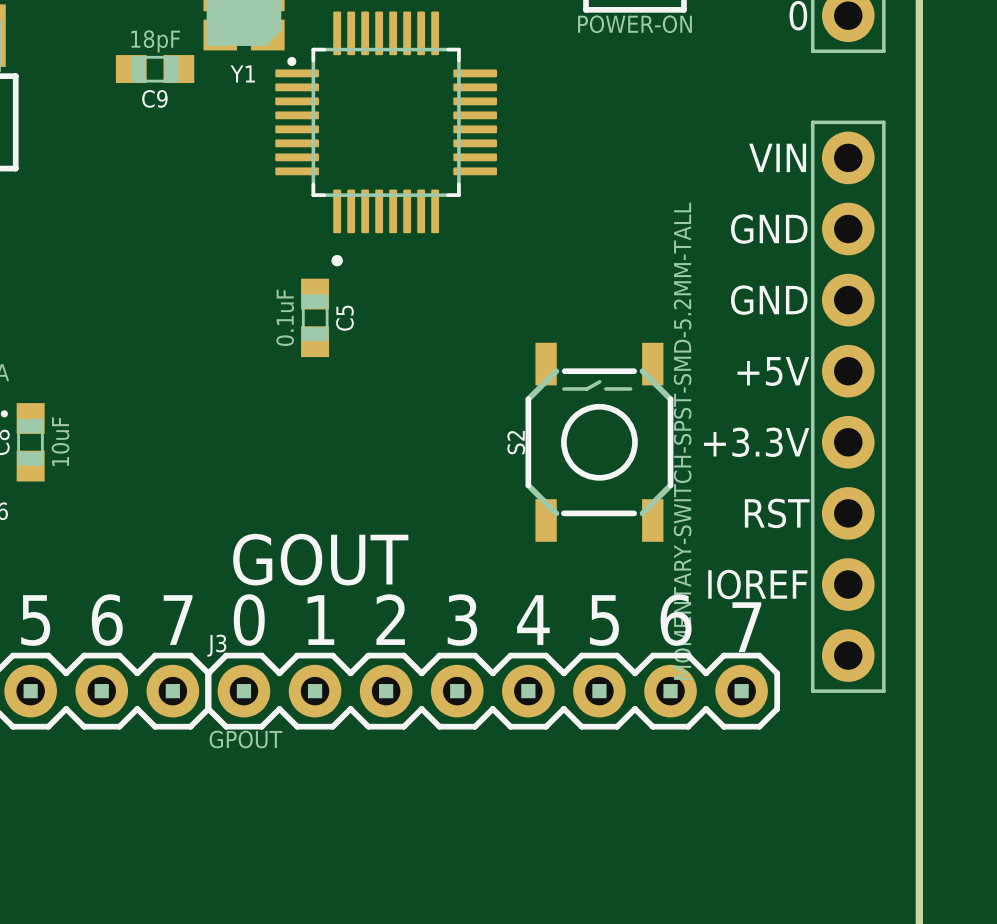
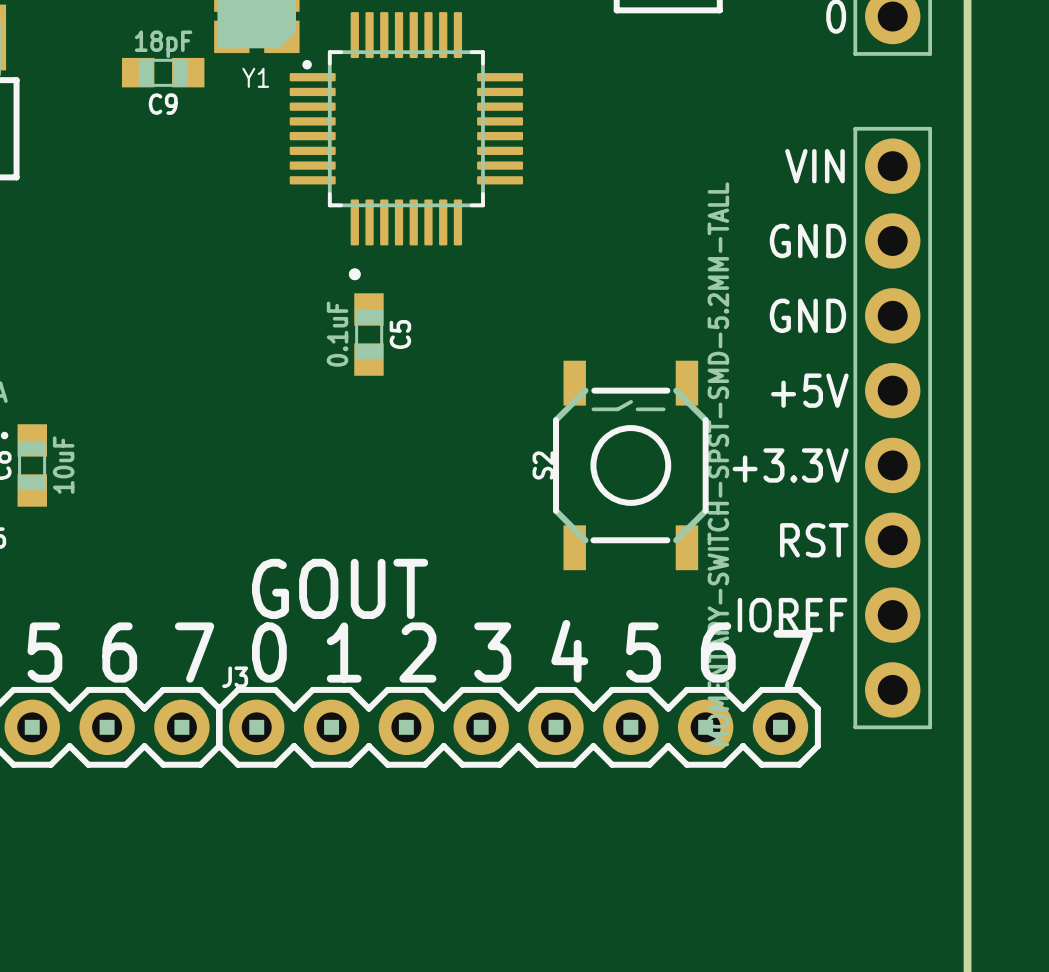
part value: POWER-ON (634, 24) -> none
C5 position: (315, 317) -> (368, 334)
J3 value: GPOUT (245, 739) -> none

